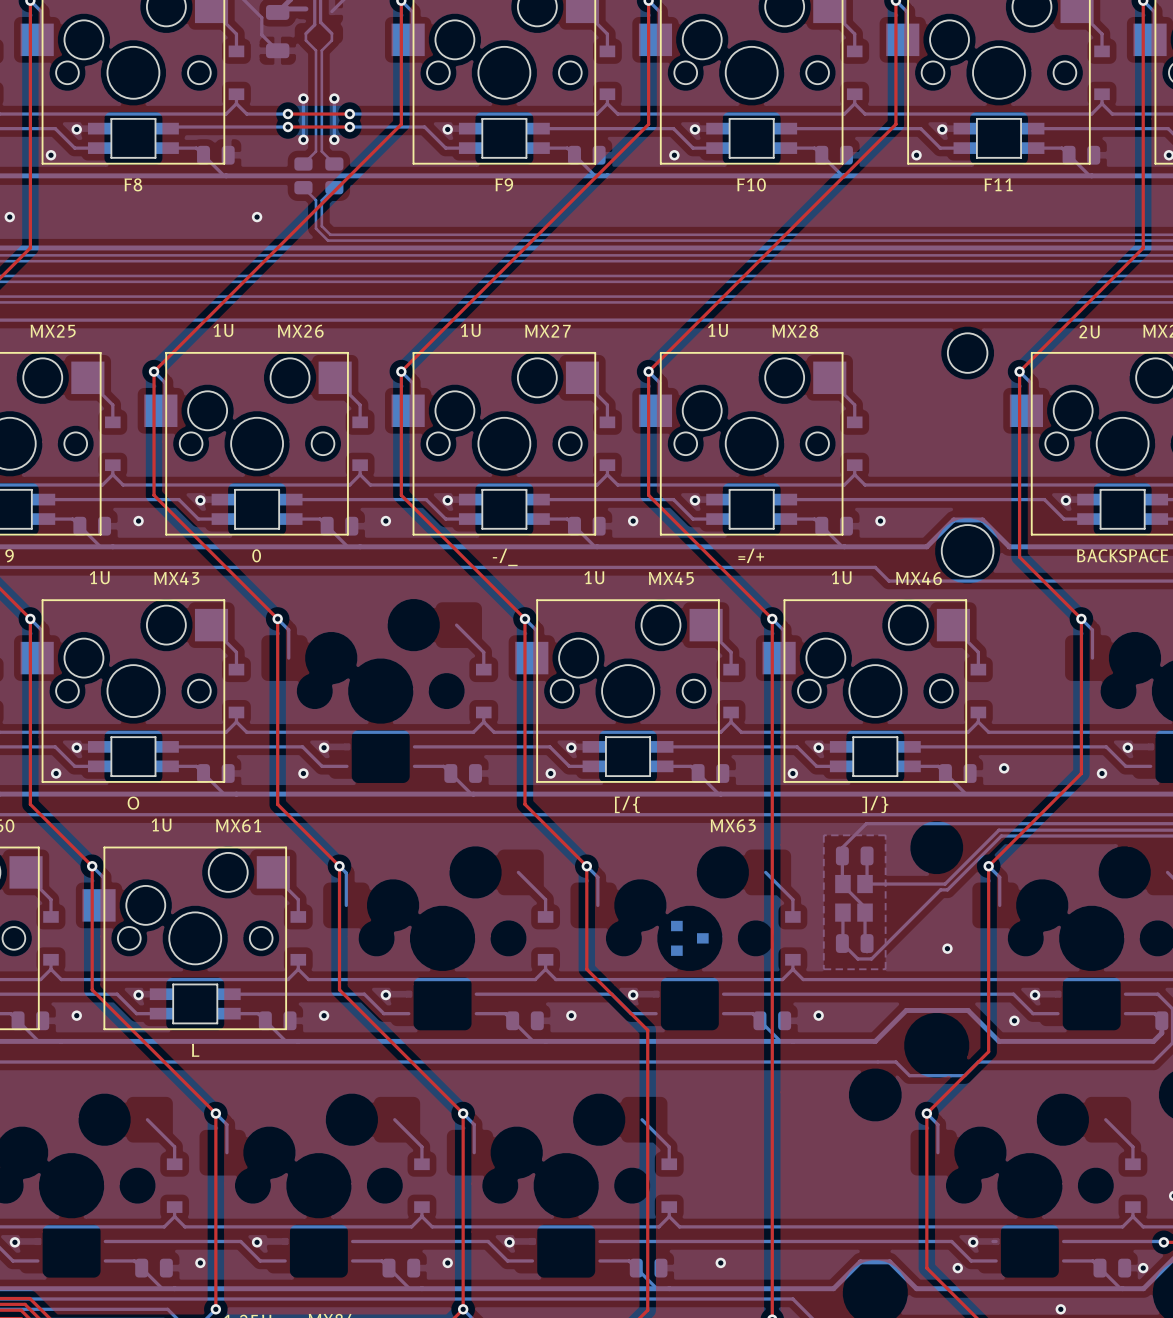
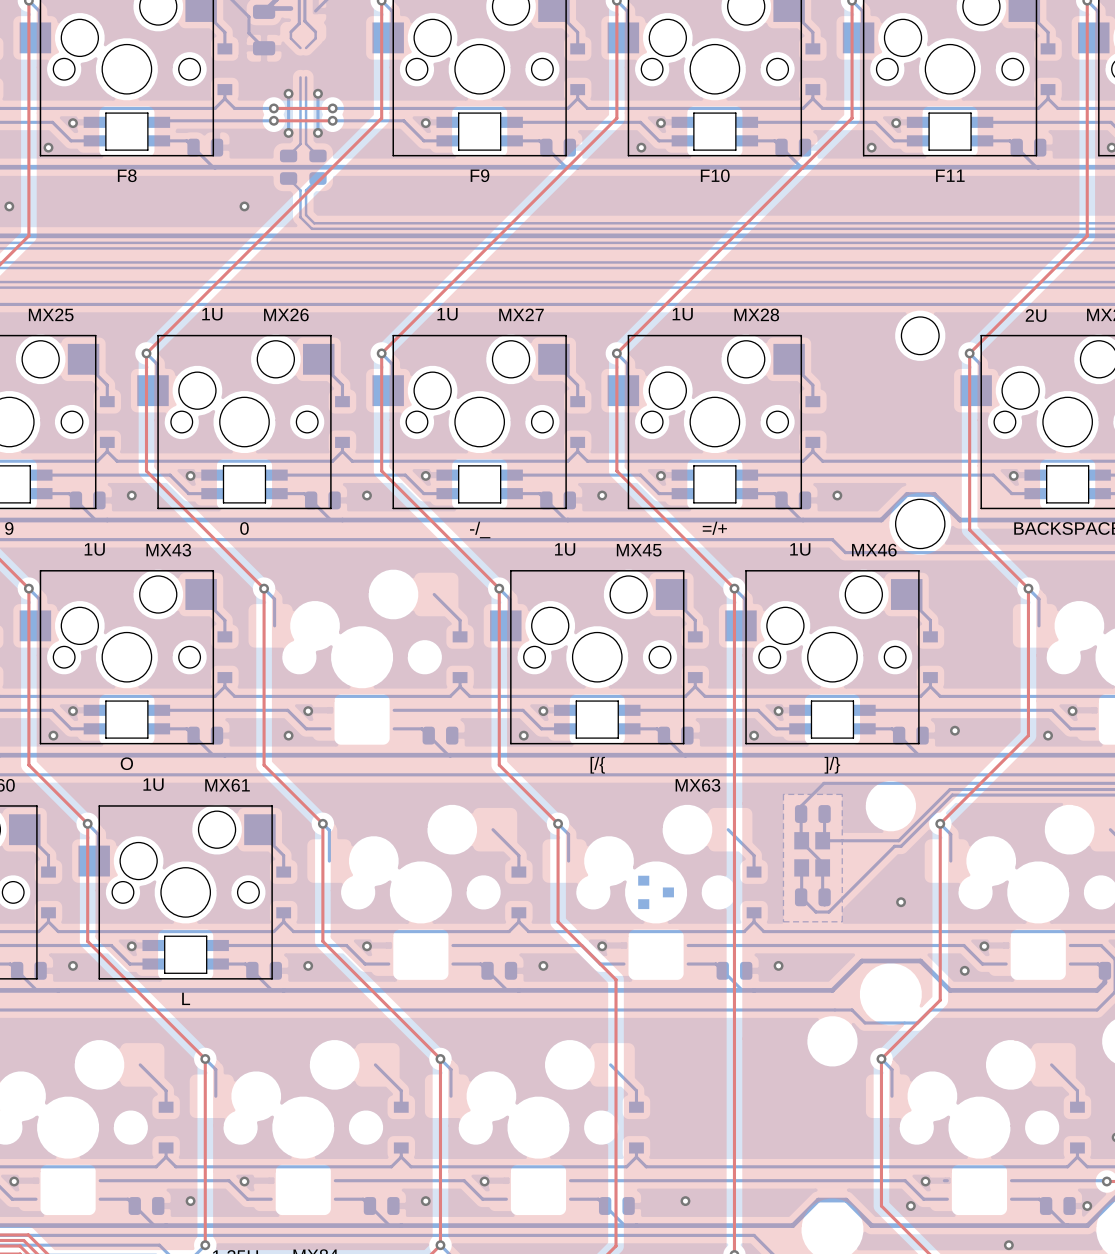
bottom track: (315, 50) (315, 81) -> none
bottom track: (321, 50) (321, 81) -> none

